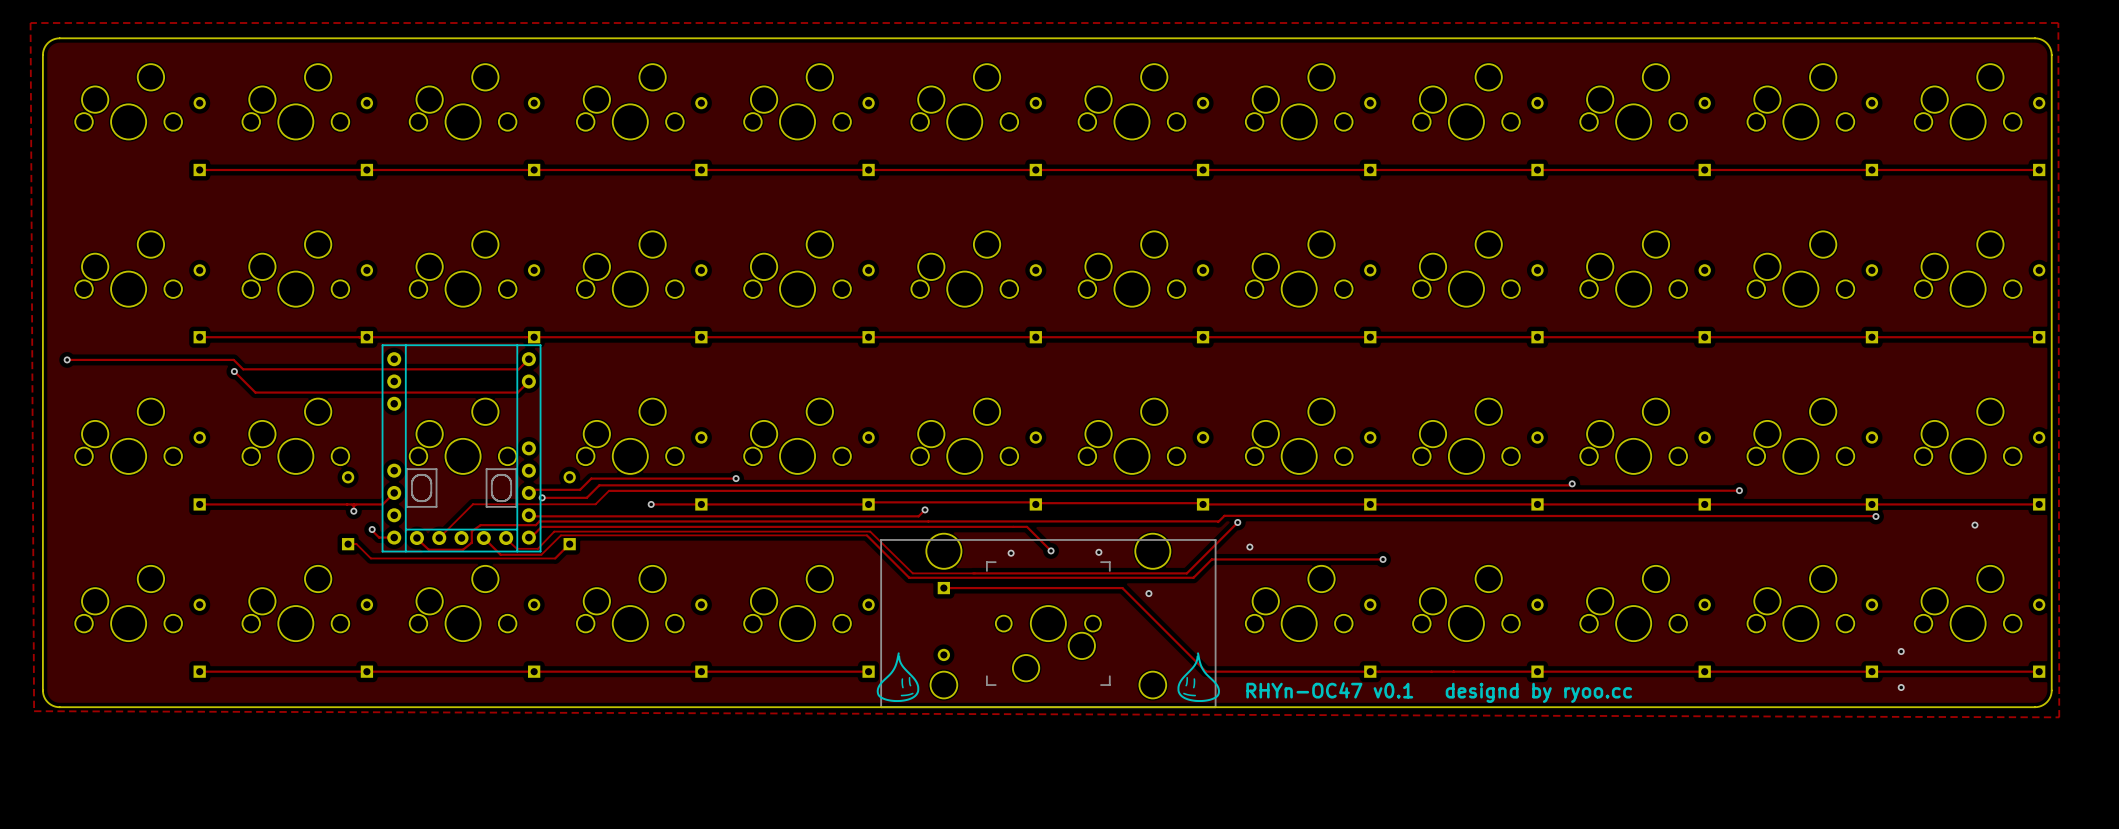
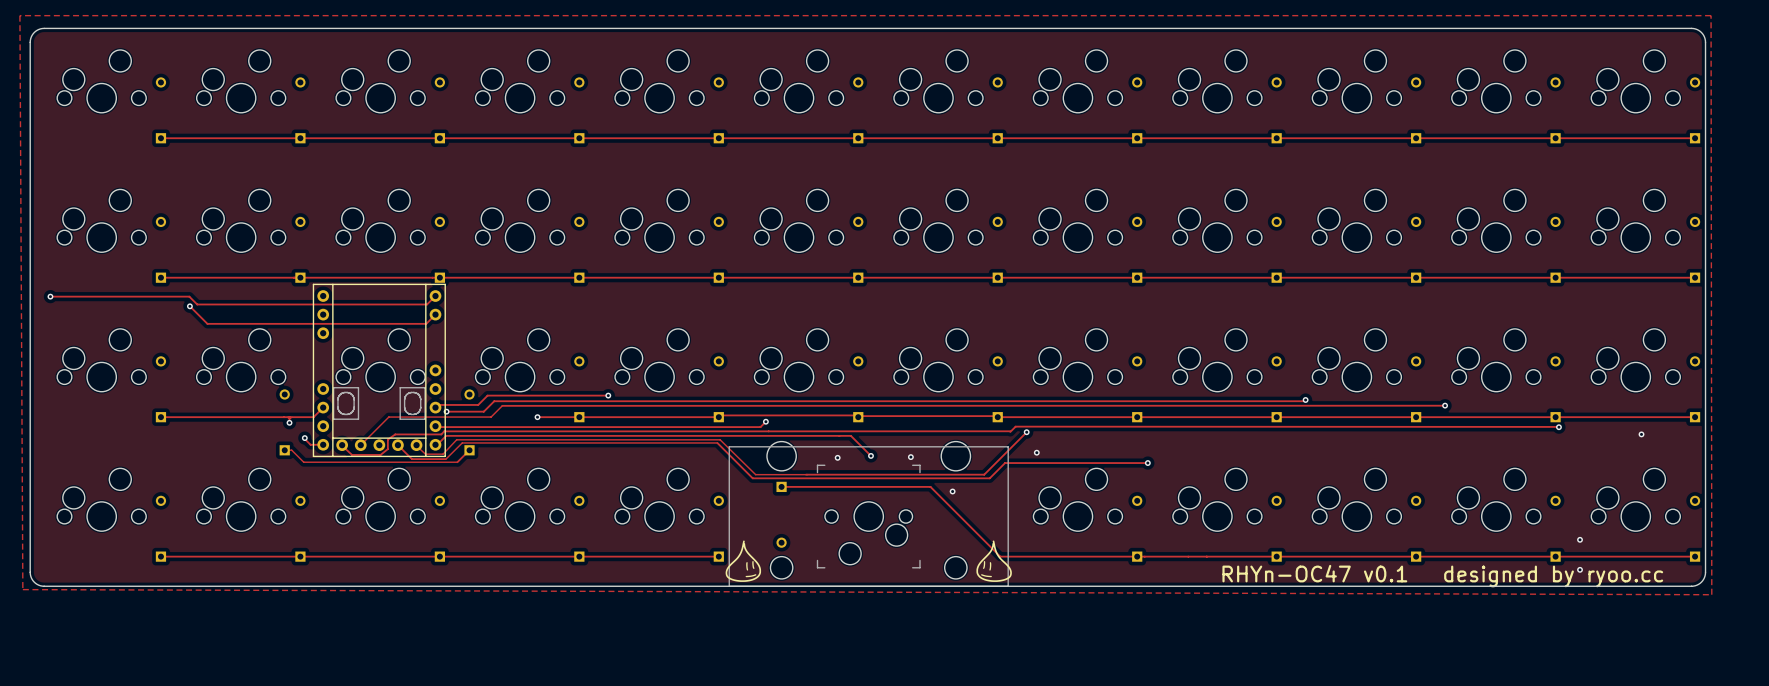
text: RHYn-OC47 v0.1 designd by ryoo.cc (1439, 692) -> none
text: none -> RHYn-OC47 v0.1 designed by ryoo.cc (1442, 576)

